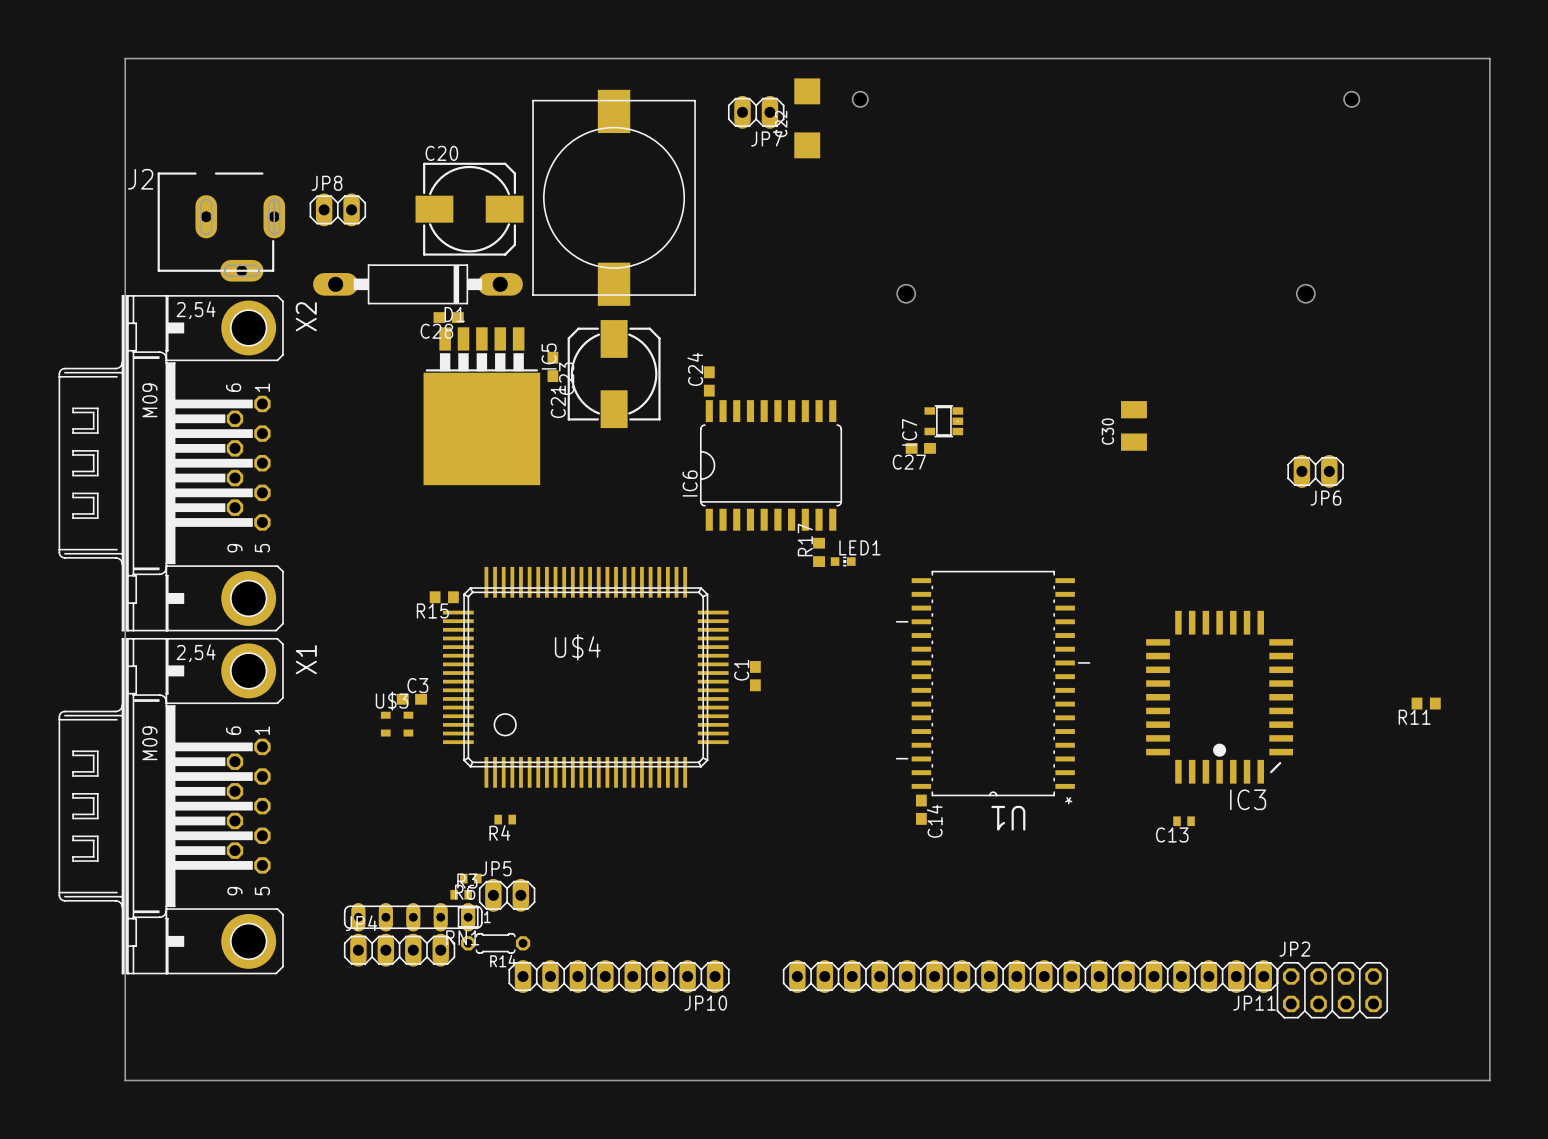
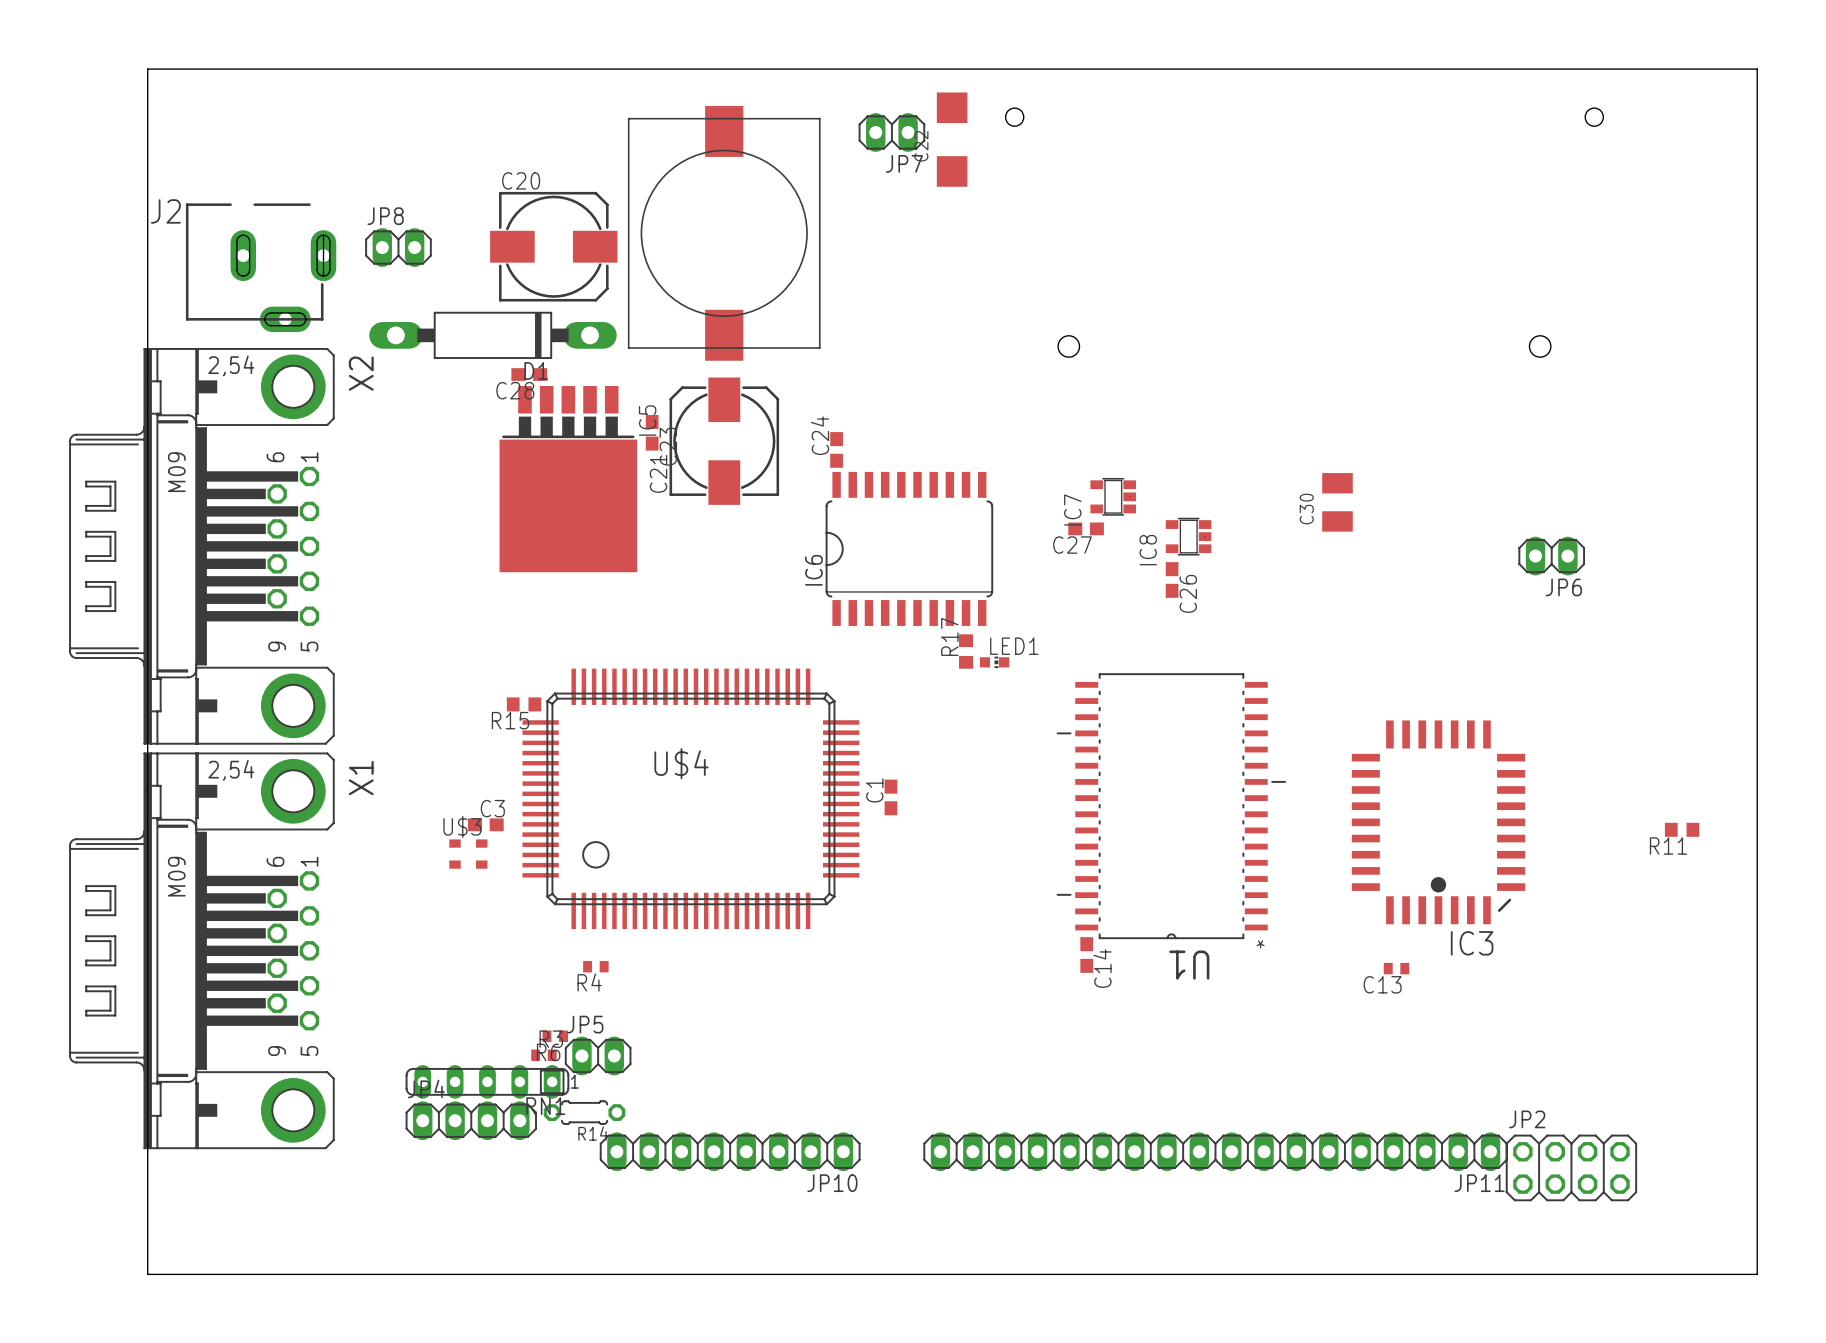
IC8: none -> (1188, 536)
C26: none -> (1172, 580)

